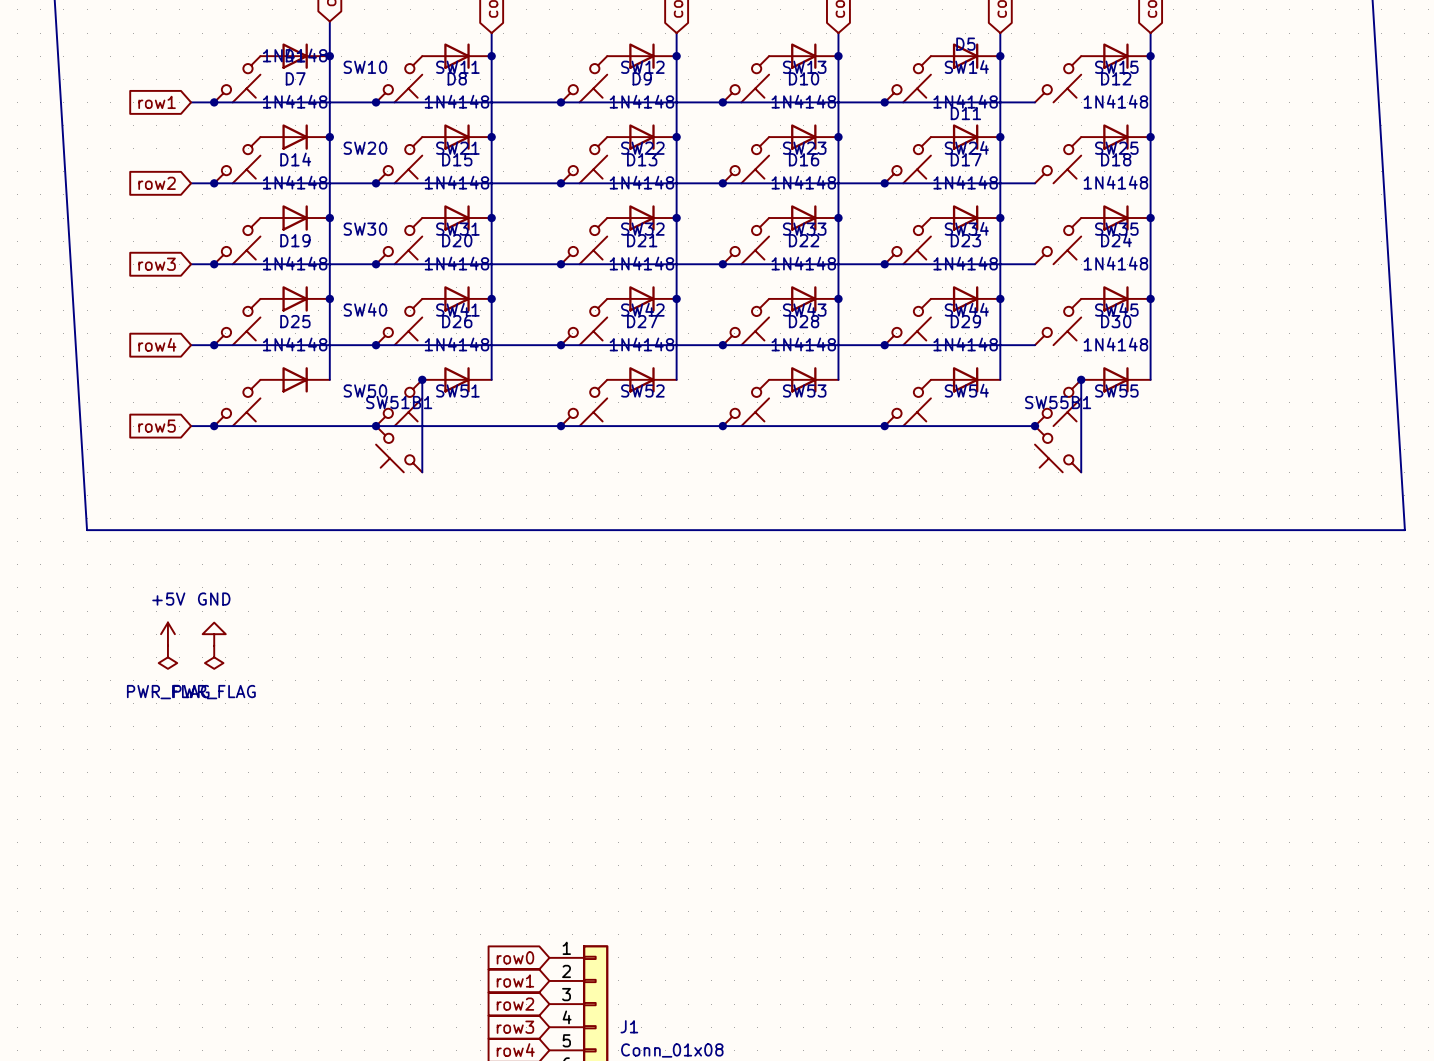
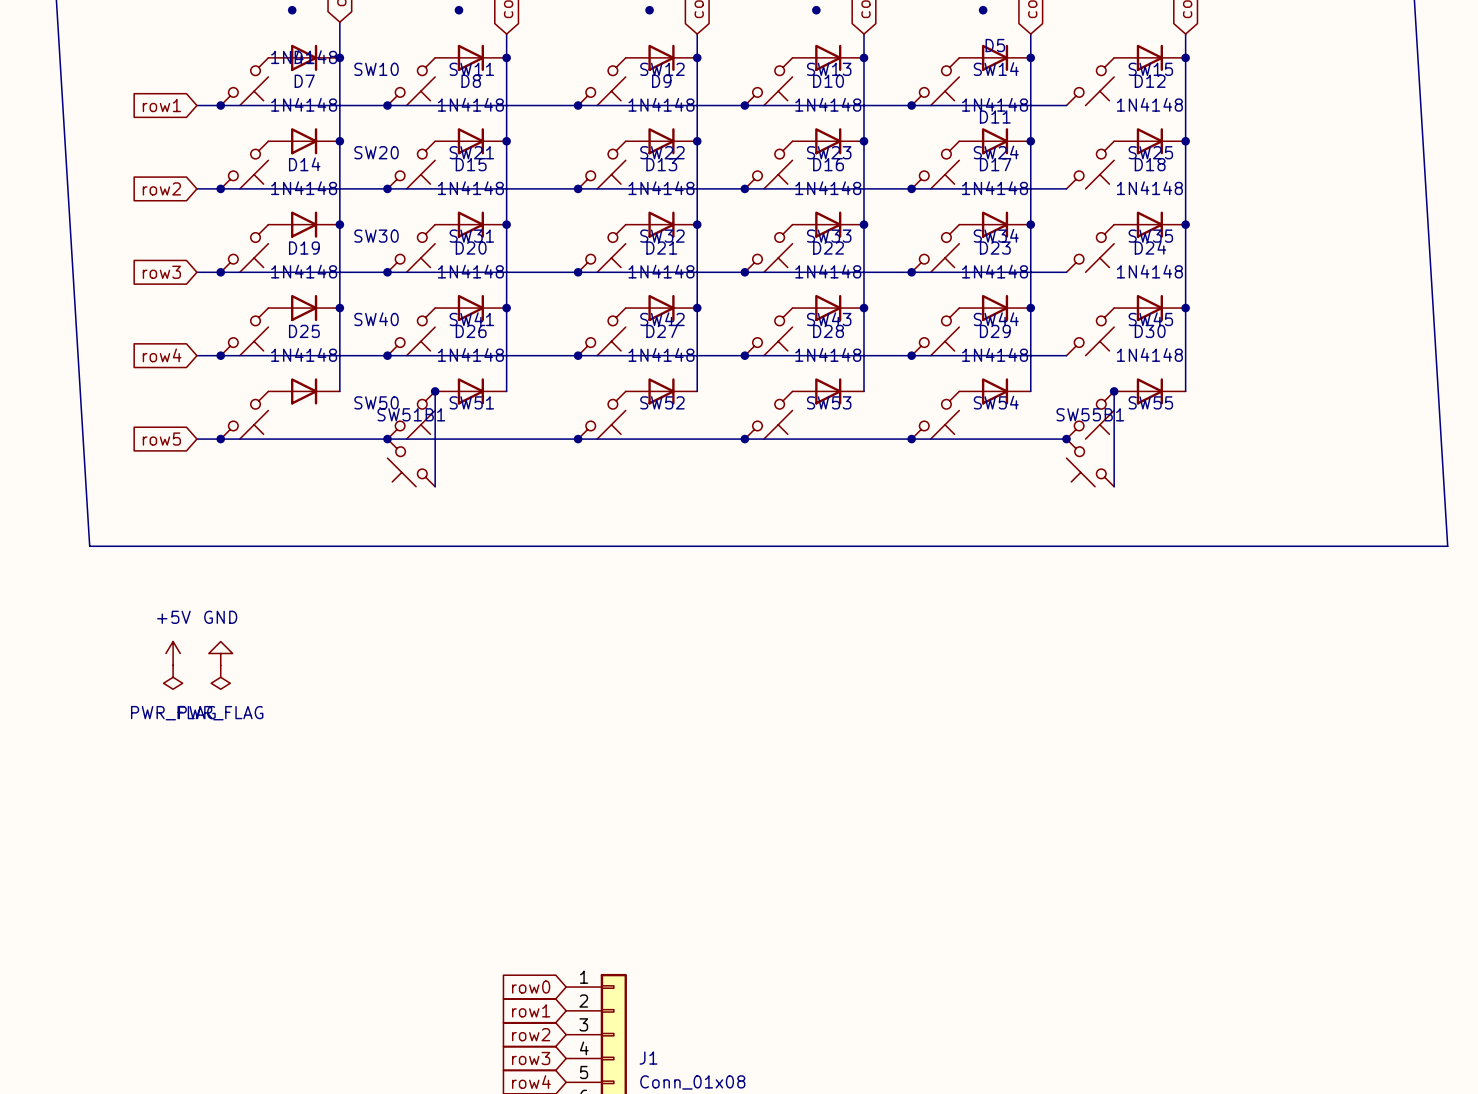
junction: none -> (292, 10)
junction: none -> (458, 10)
junction: none -> (649, 10)
junction: none -> (816, 10)
junction: none -> (983, 10)

